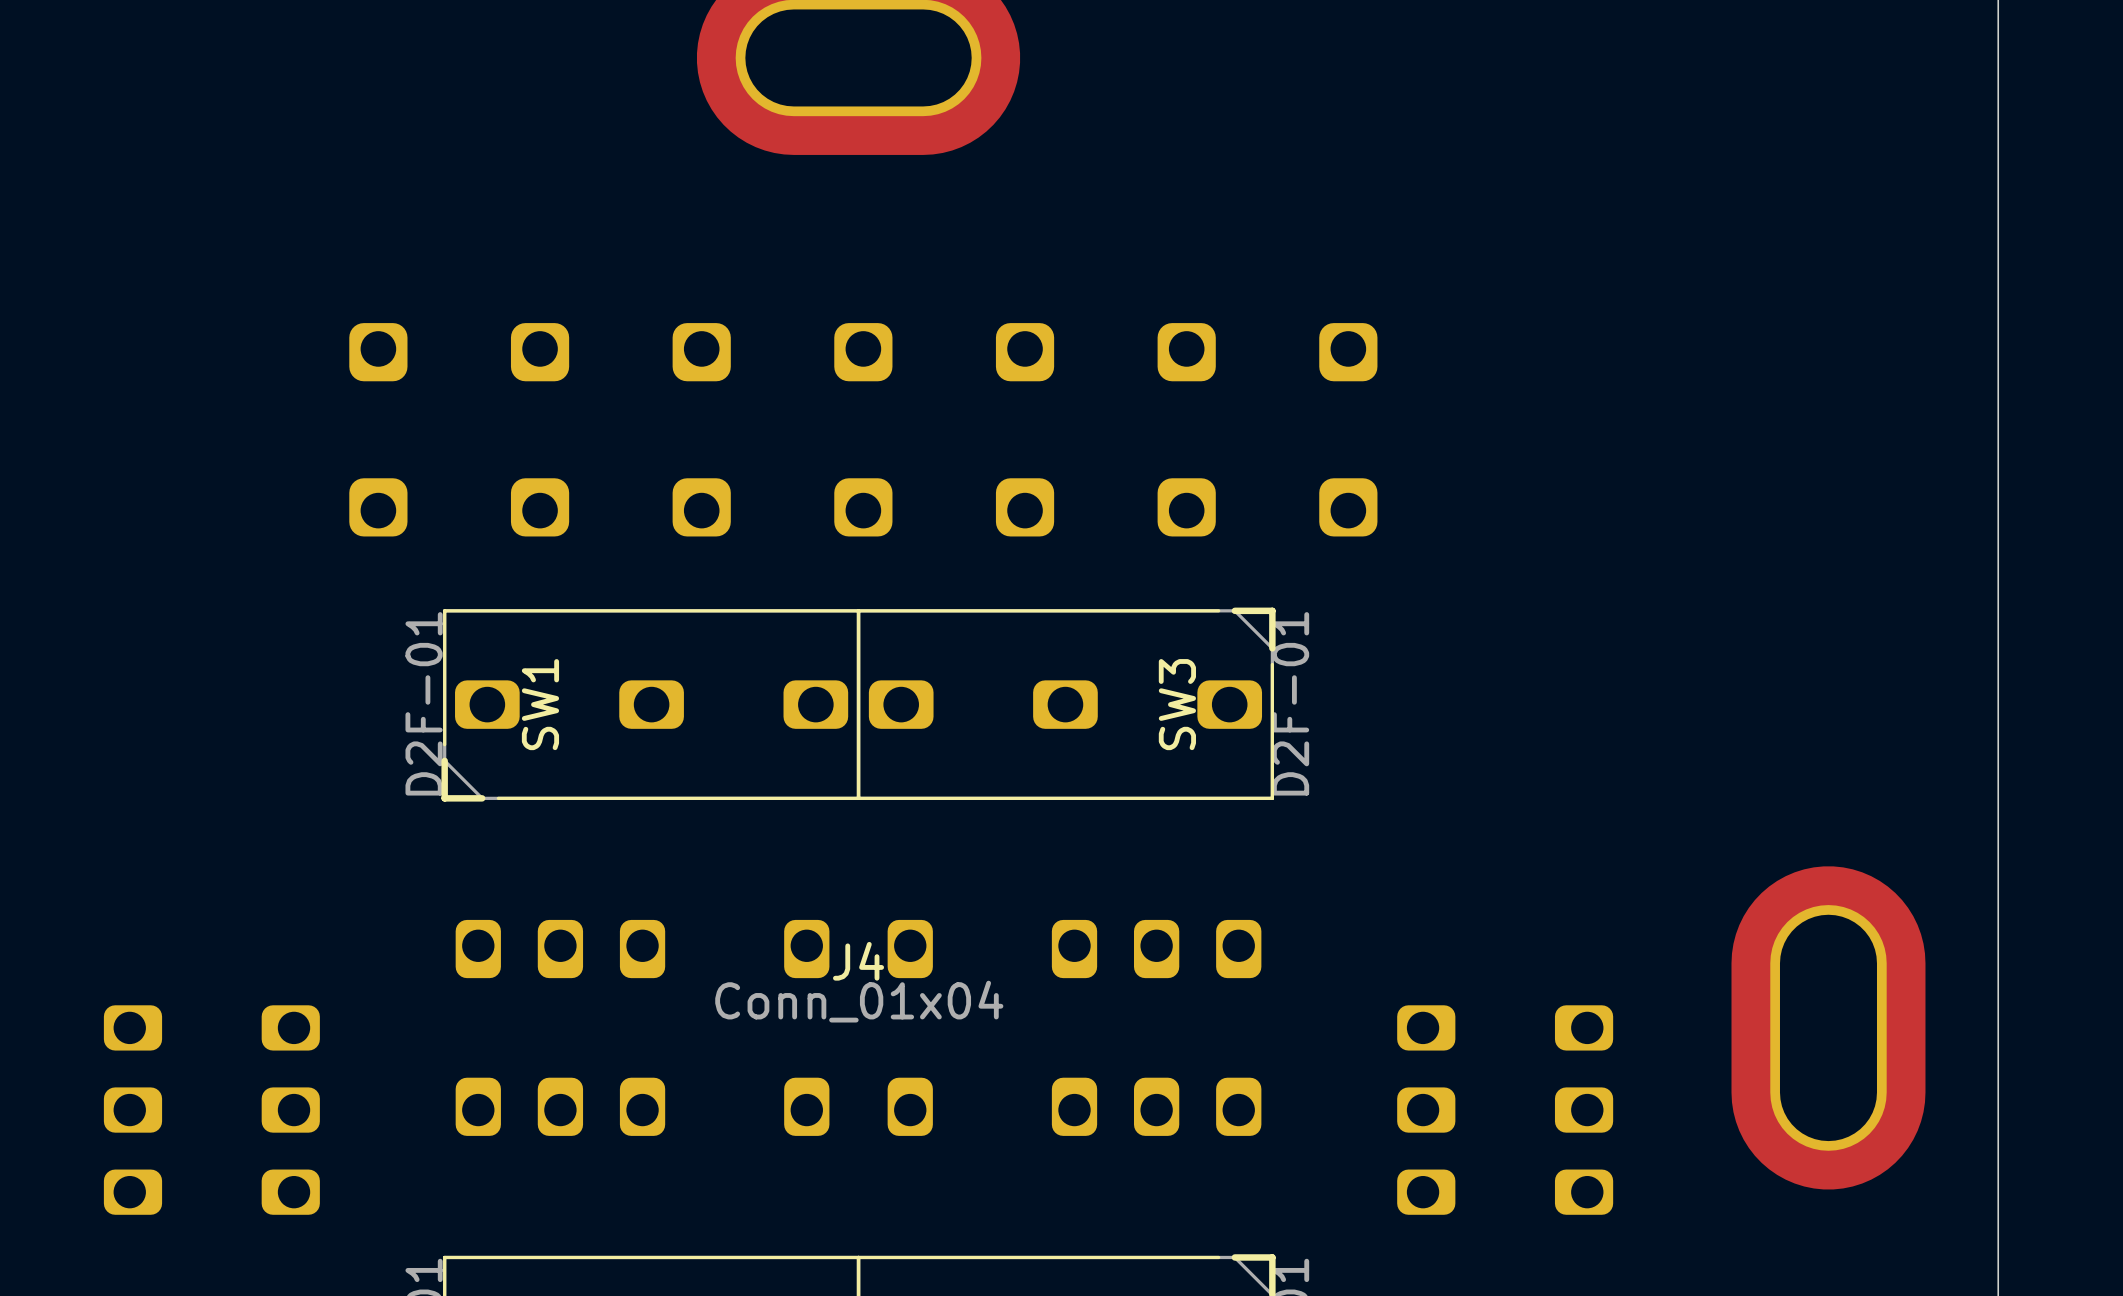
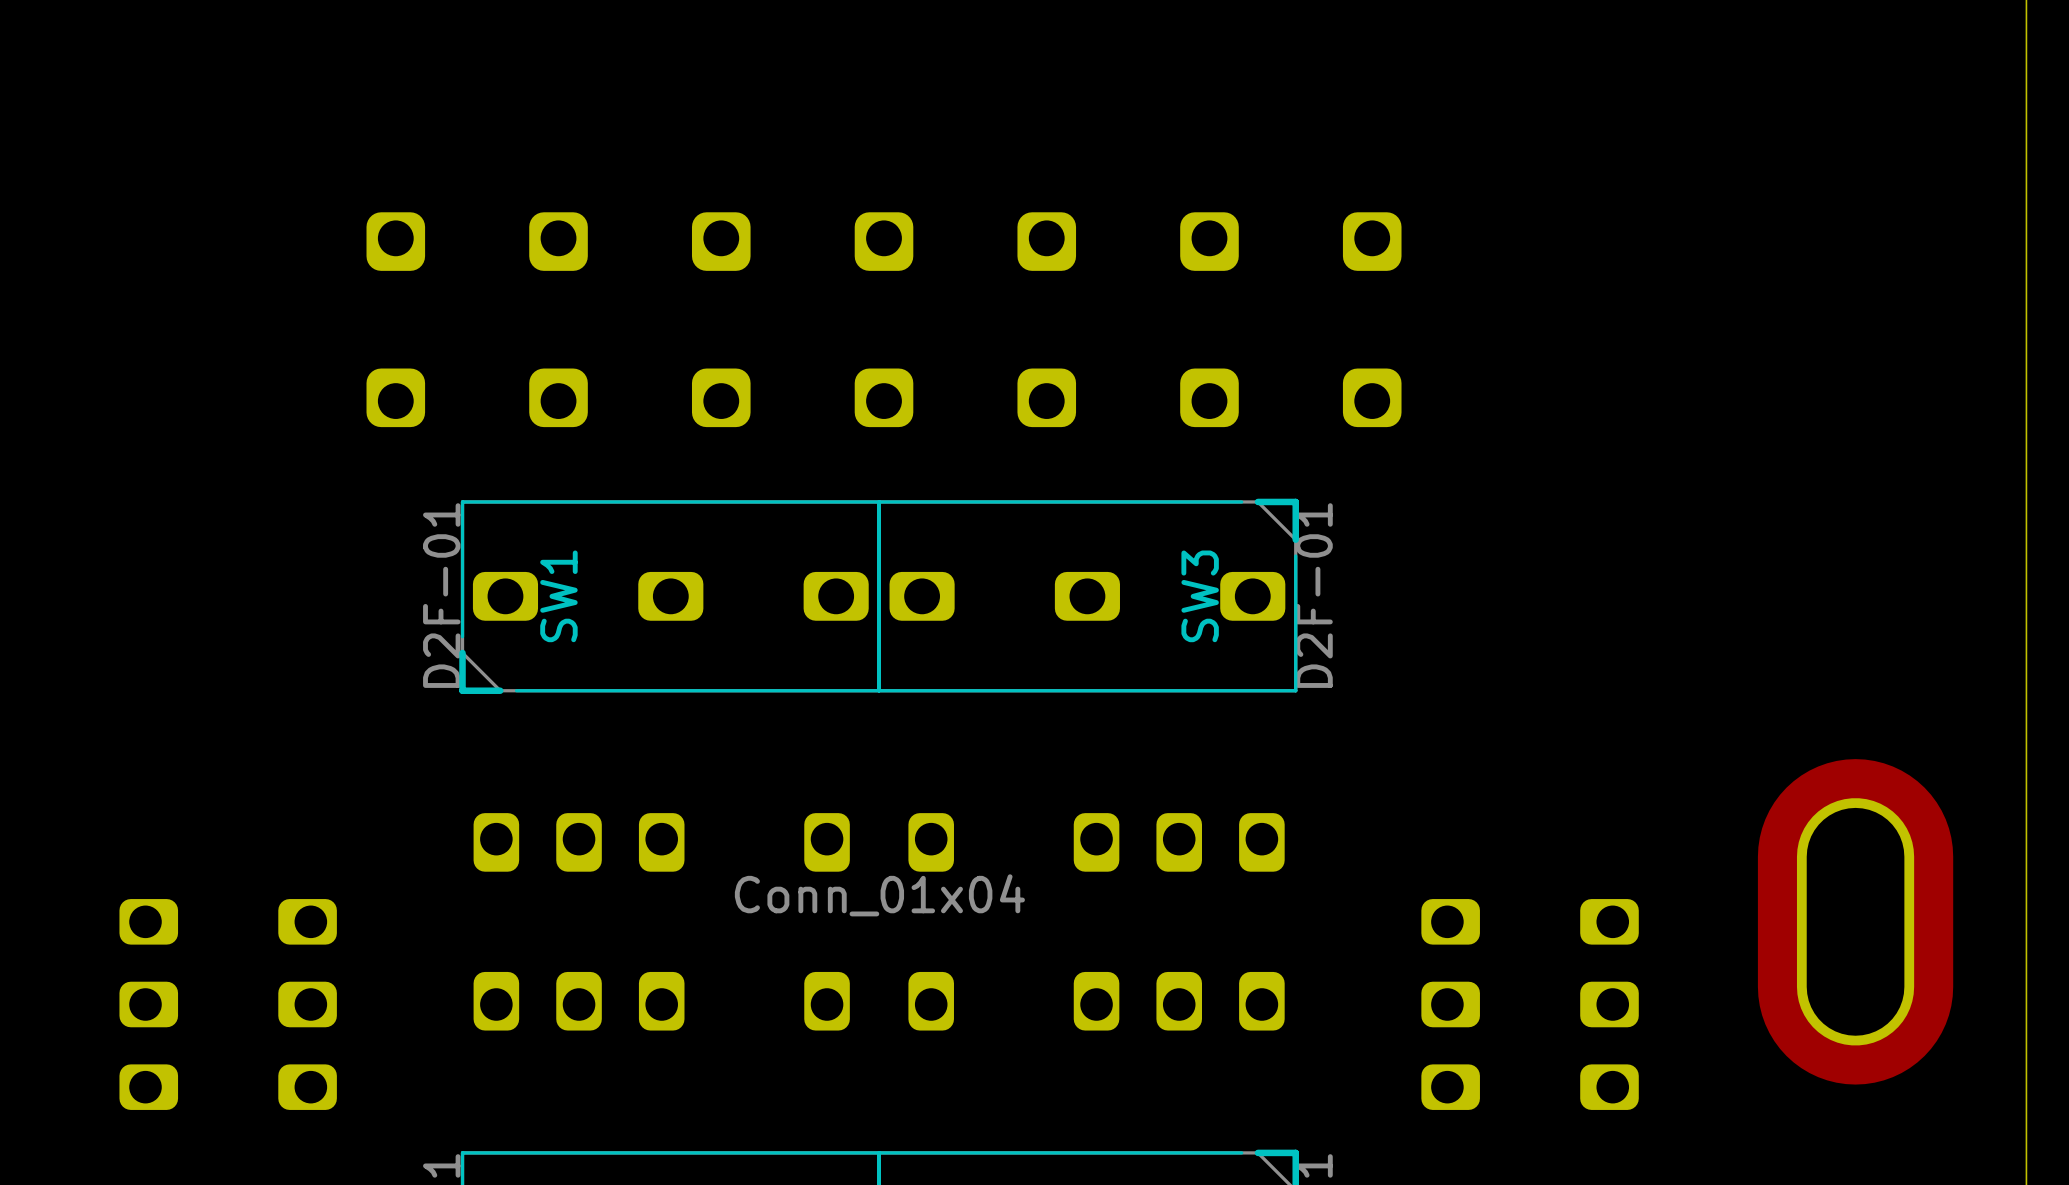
J4 name: J4 (858, 961) -> none

